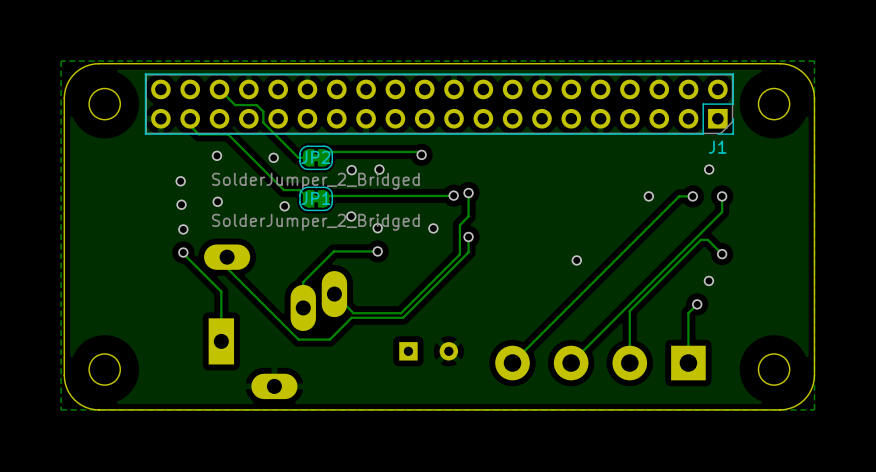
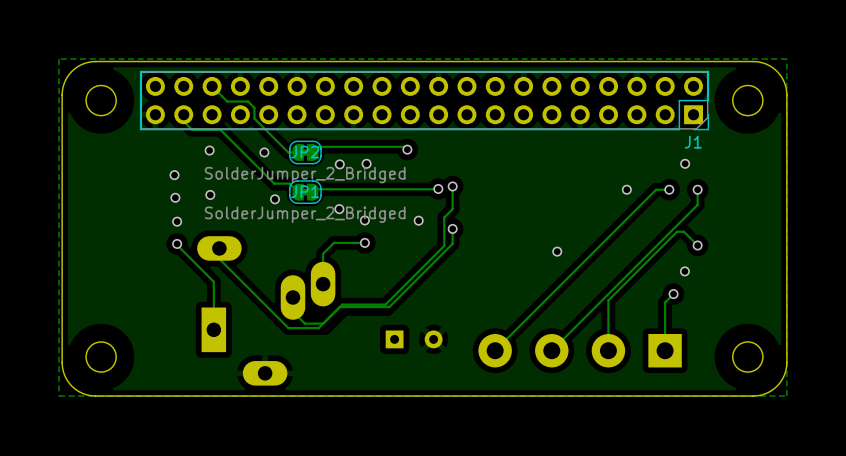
track: (345, 251) (333, 251) (303, 282) (303, 307) -> (333, 242) (323, 253) (323, 284)
track: (334, 294) (353, 313) (401, 313) -> (292, 311) (304, 323) (323, 323) (342, 304) (385, 304) (387, 302)

